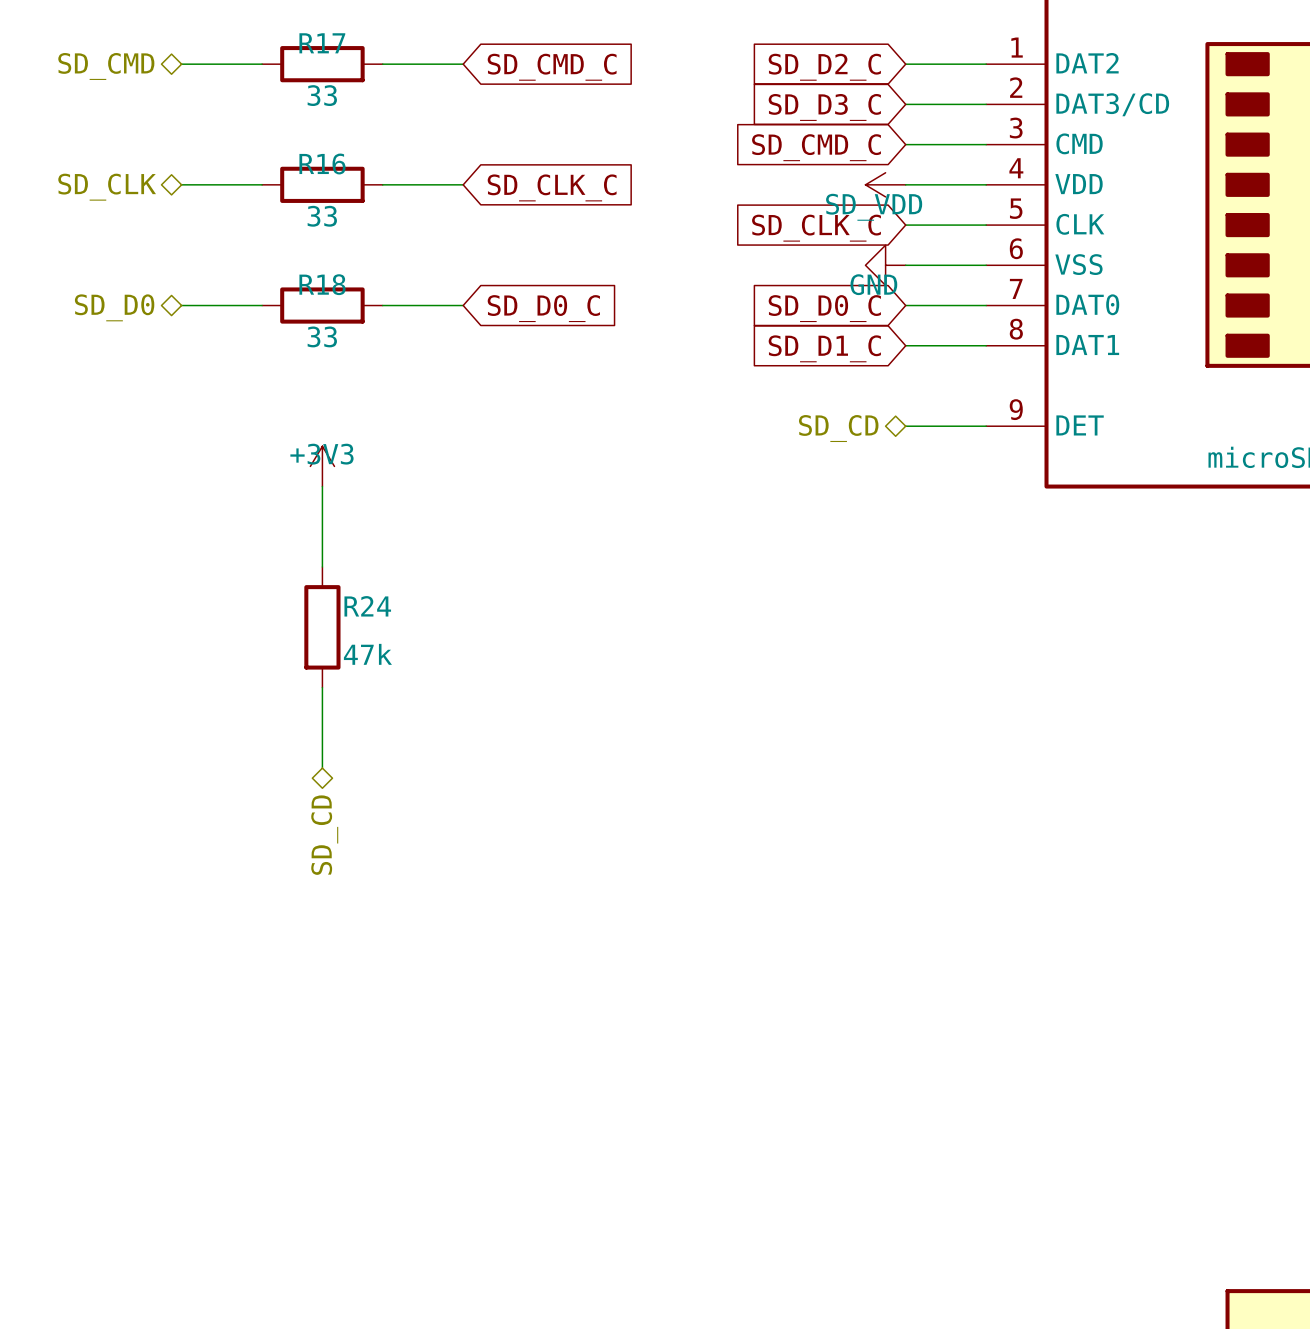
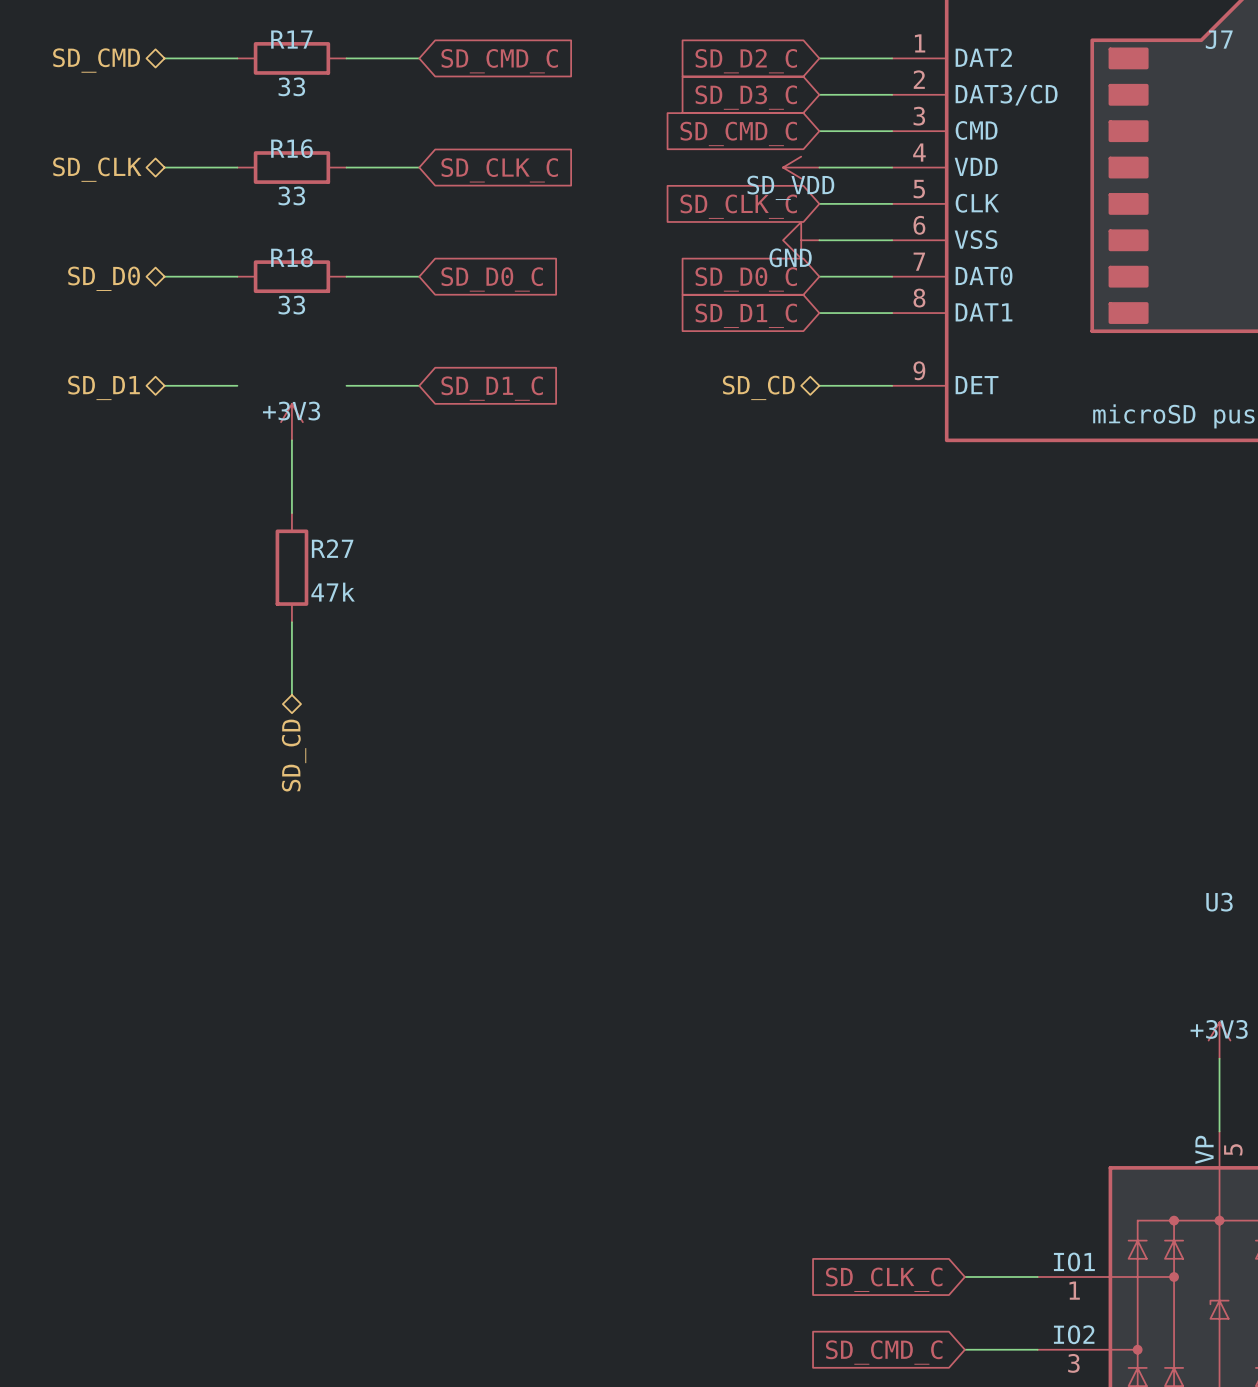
wire: none -> (164, 385) (237, 385)
wire: none -> (346, 385) (419, 385)
hierarchical label: none -> SD_D1 (103, 387)
global label: none -> SD_D1_C (492, 388)
R24 name: R24 (367, 606) -> R27 (332, 548)

